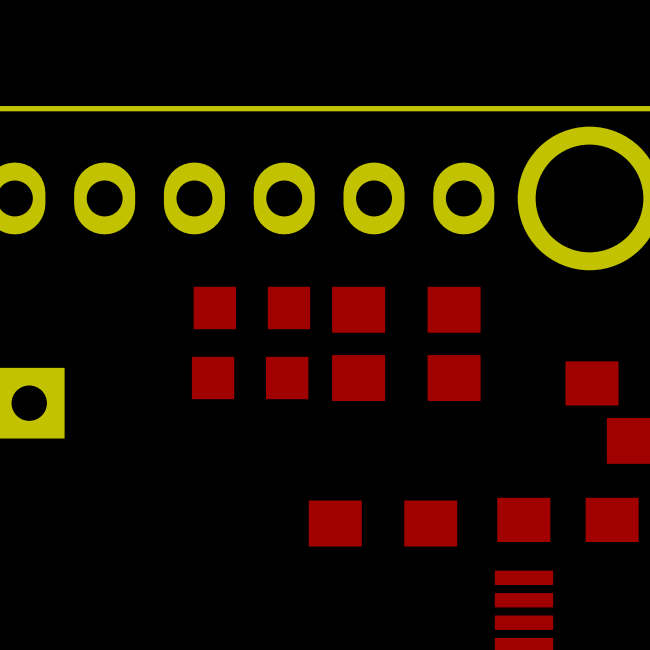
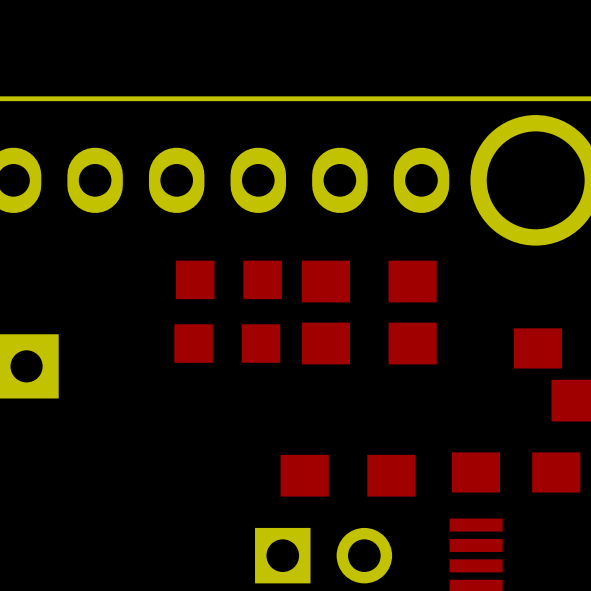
part: none -> (323, 555)

